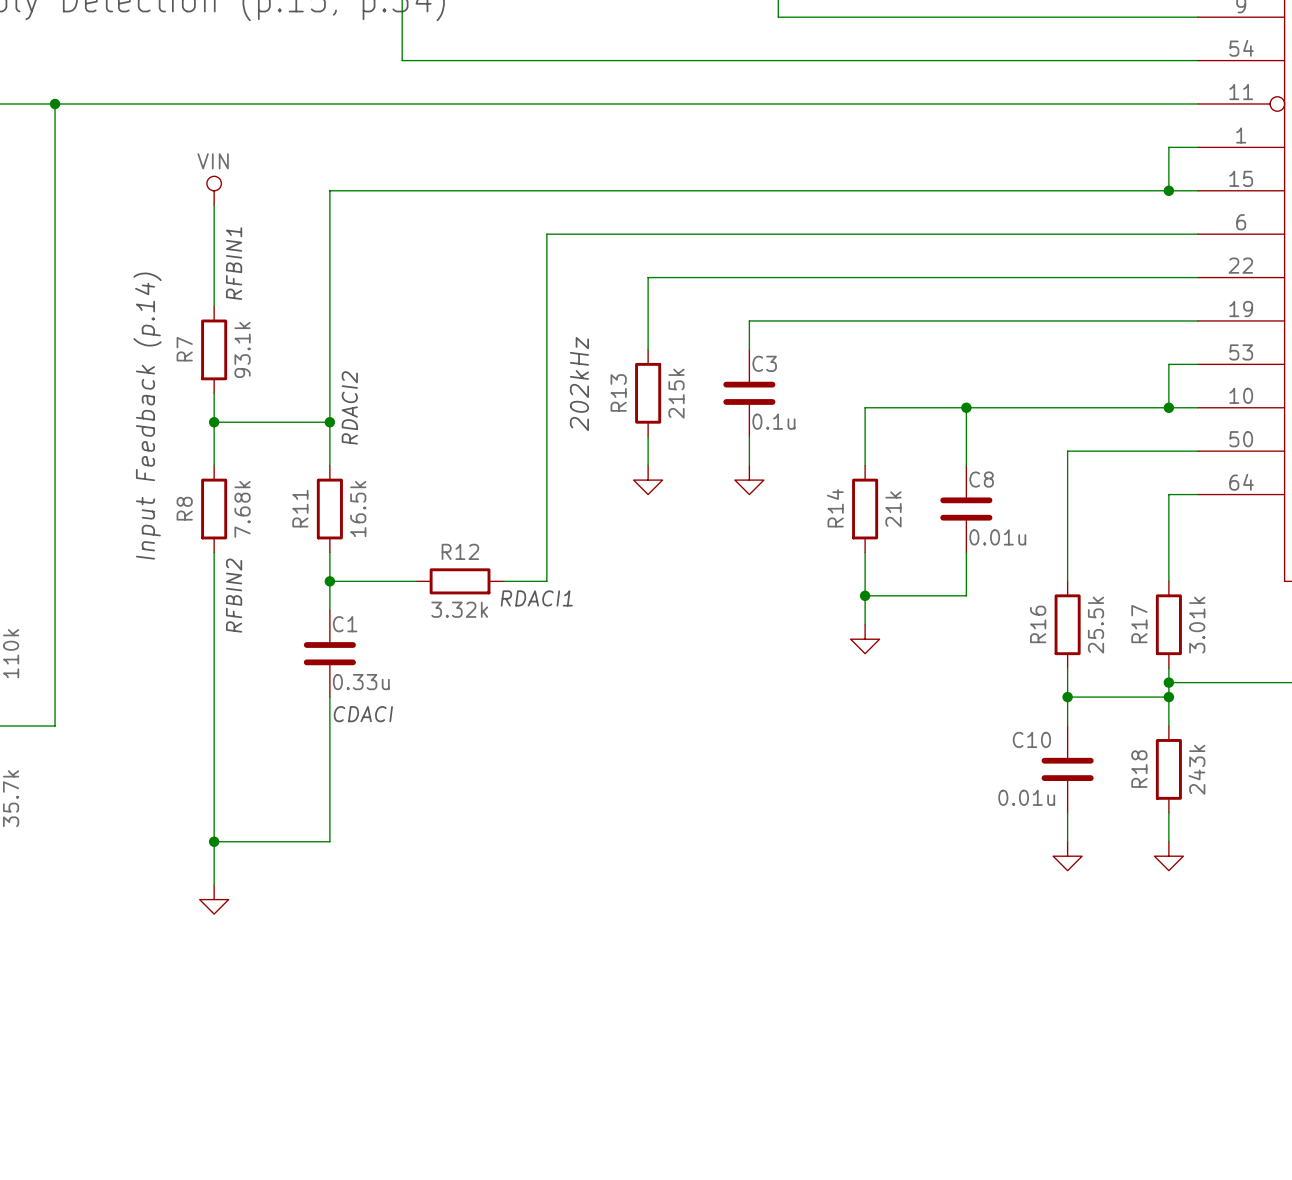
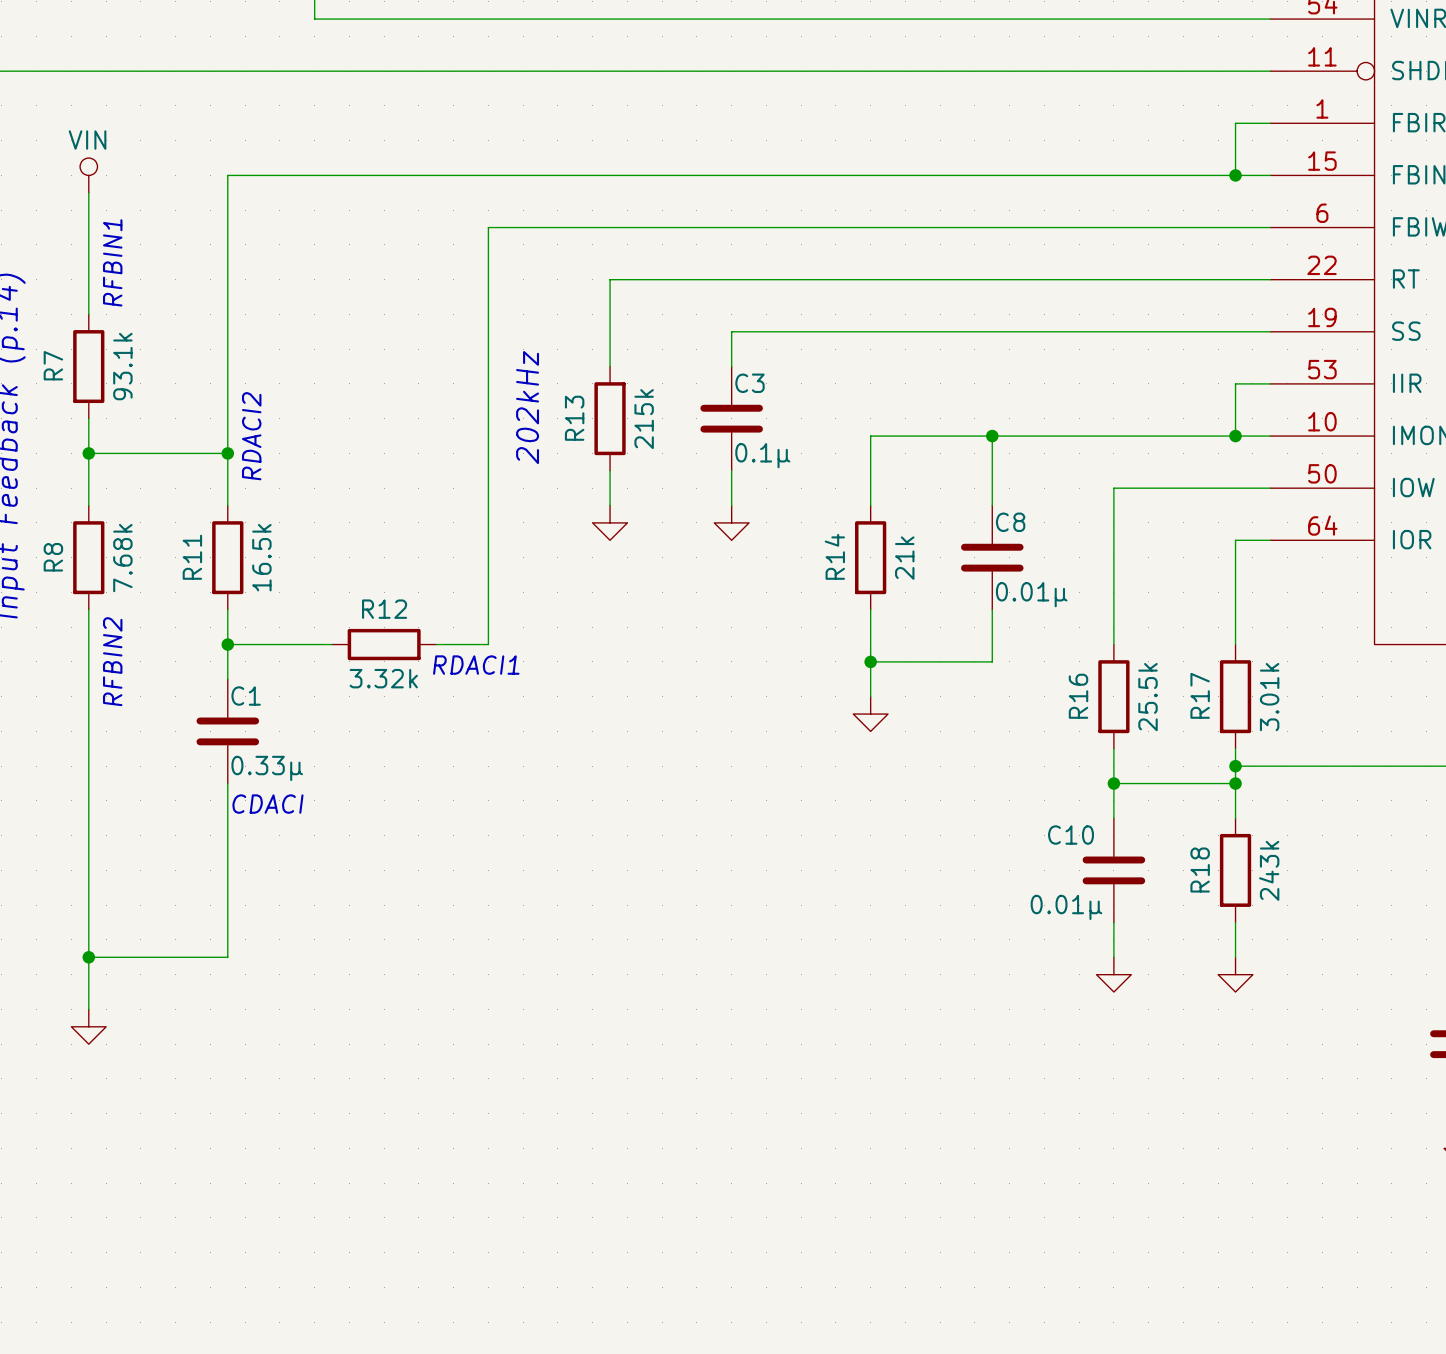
C3 value: 0.1u (773, 421) -> 0.1μ (762, 455)
C8 value: 0.01u (997, 537) -> 0.01μ (1031, 594)
C1 value: 0.33u (361, 682) -> 0.33μ (267, 768)
C10 value: 0.01u (1026, 797) -> 0.01μ (1066, 907)

